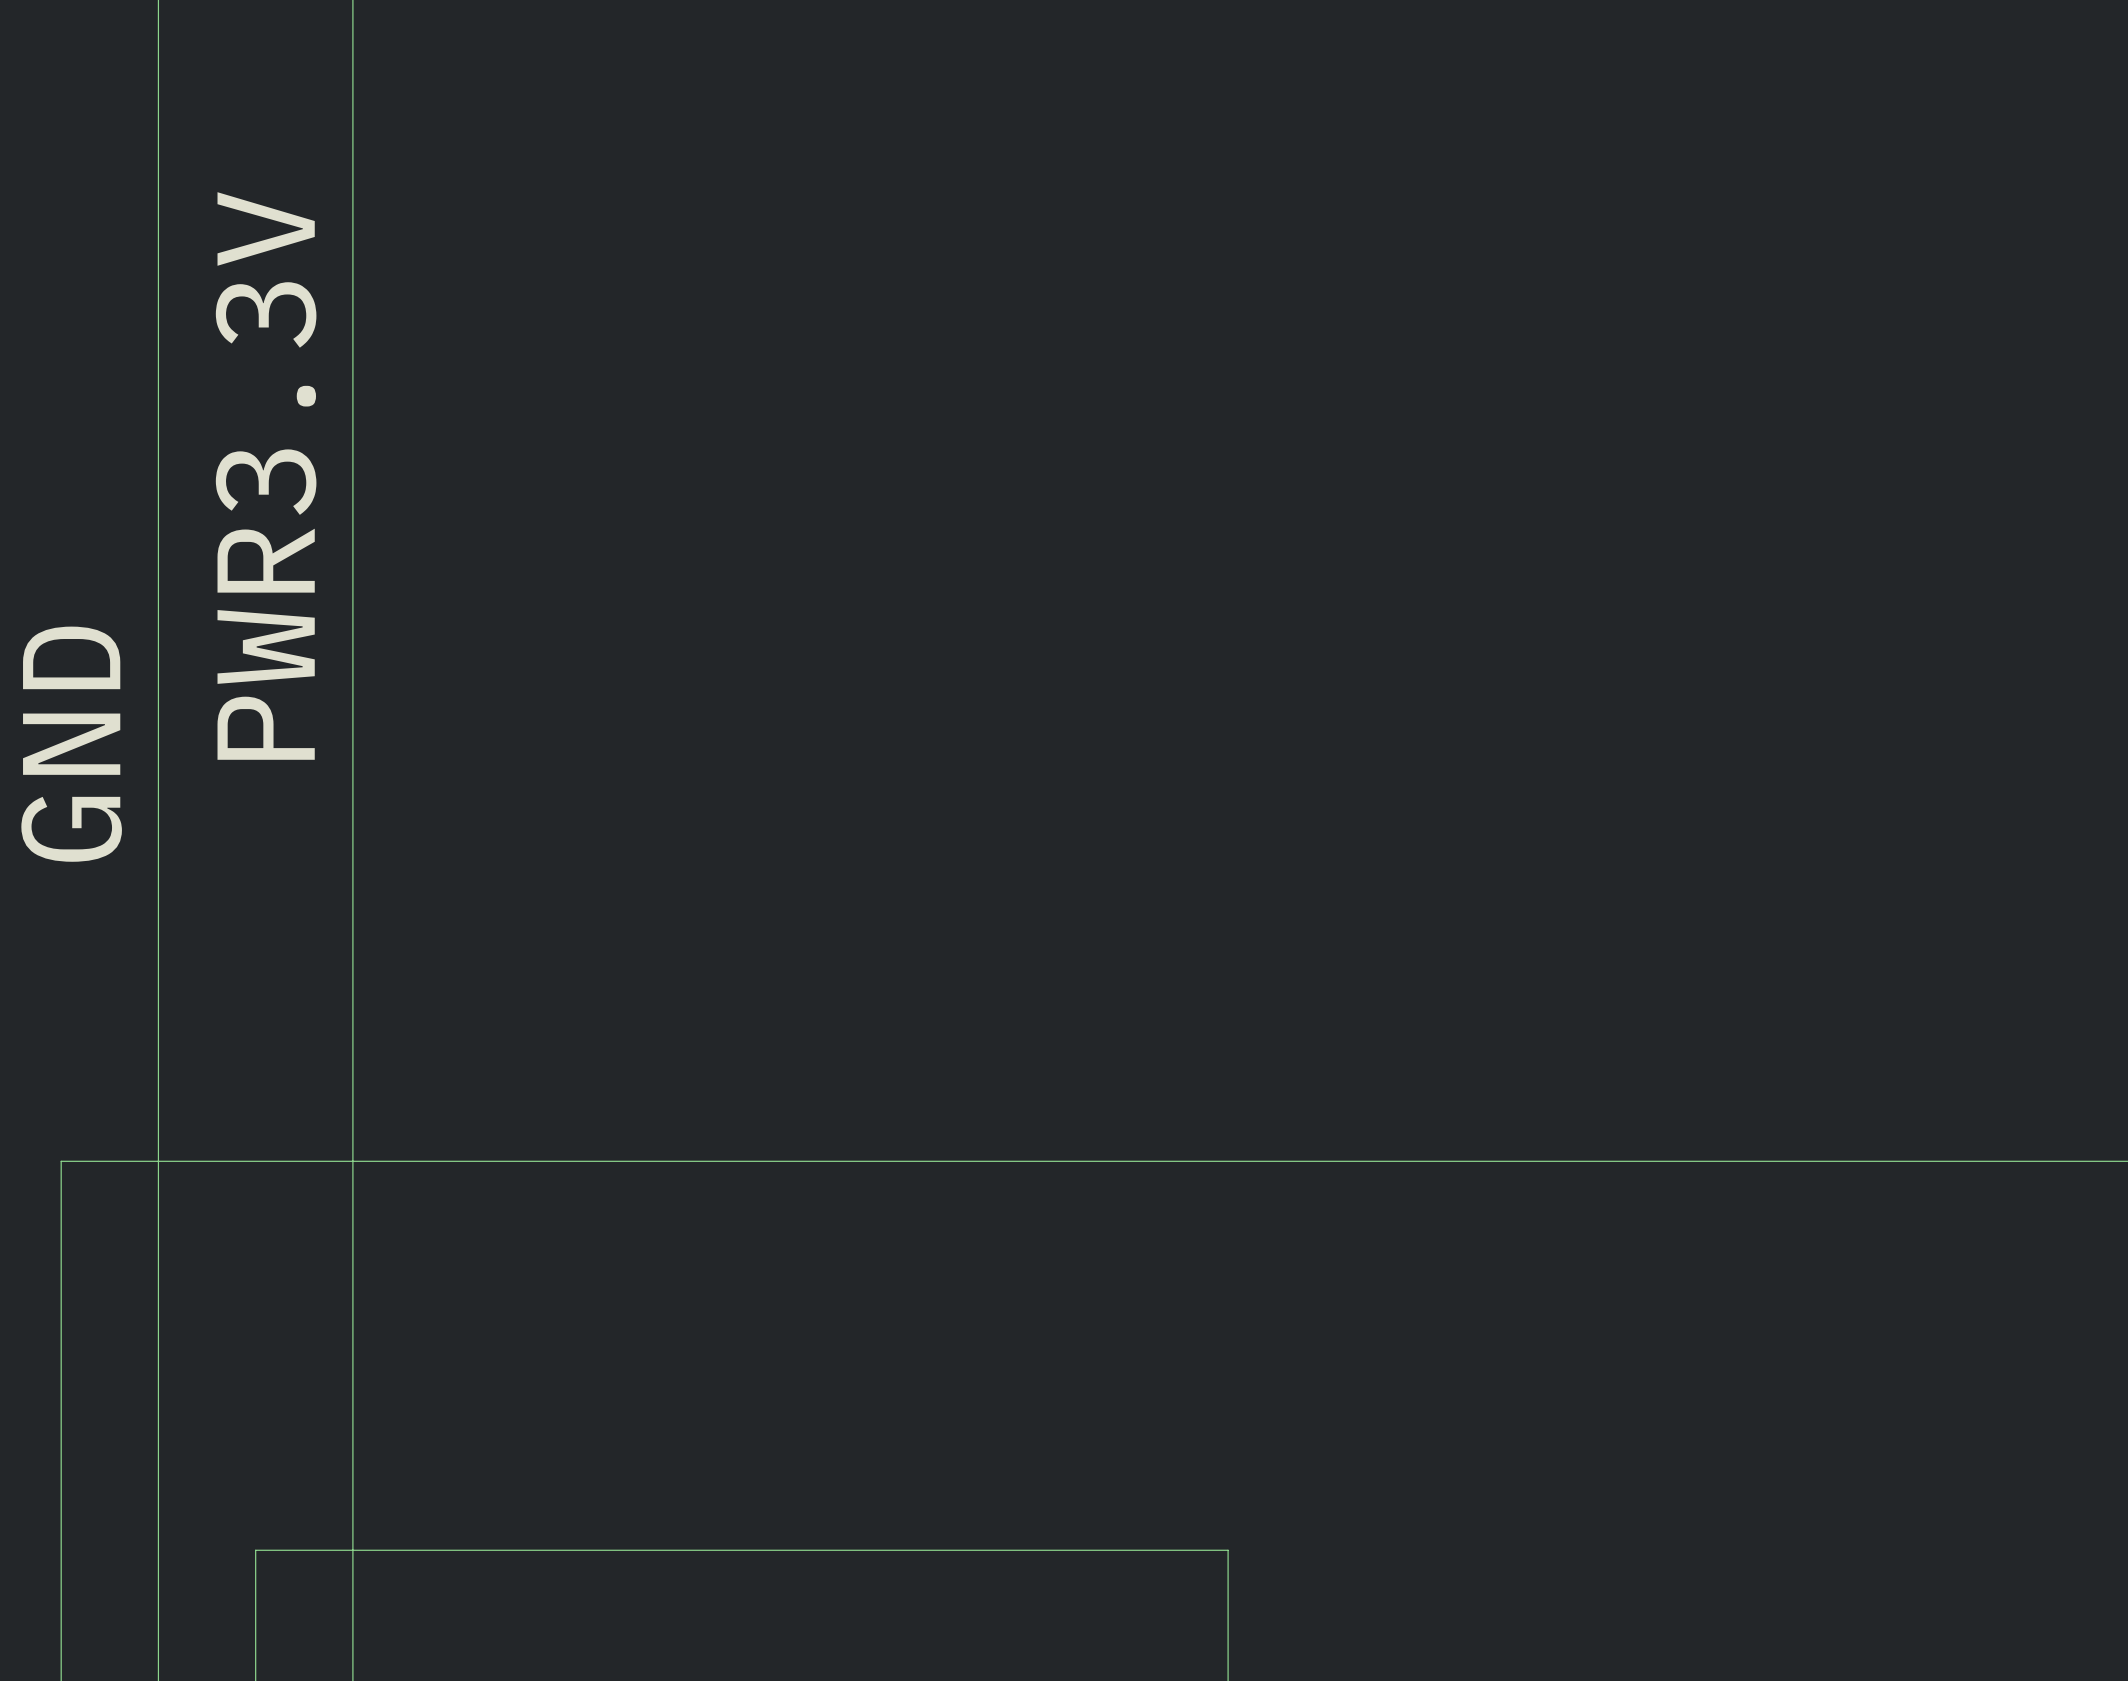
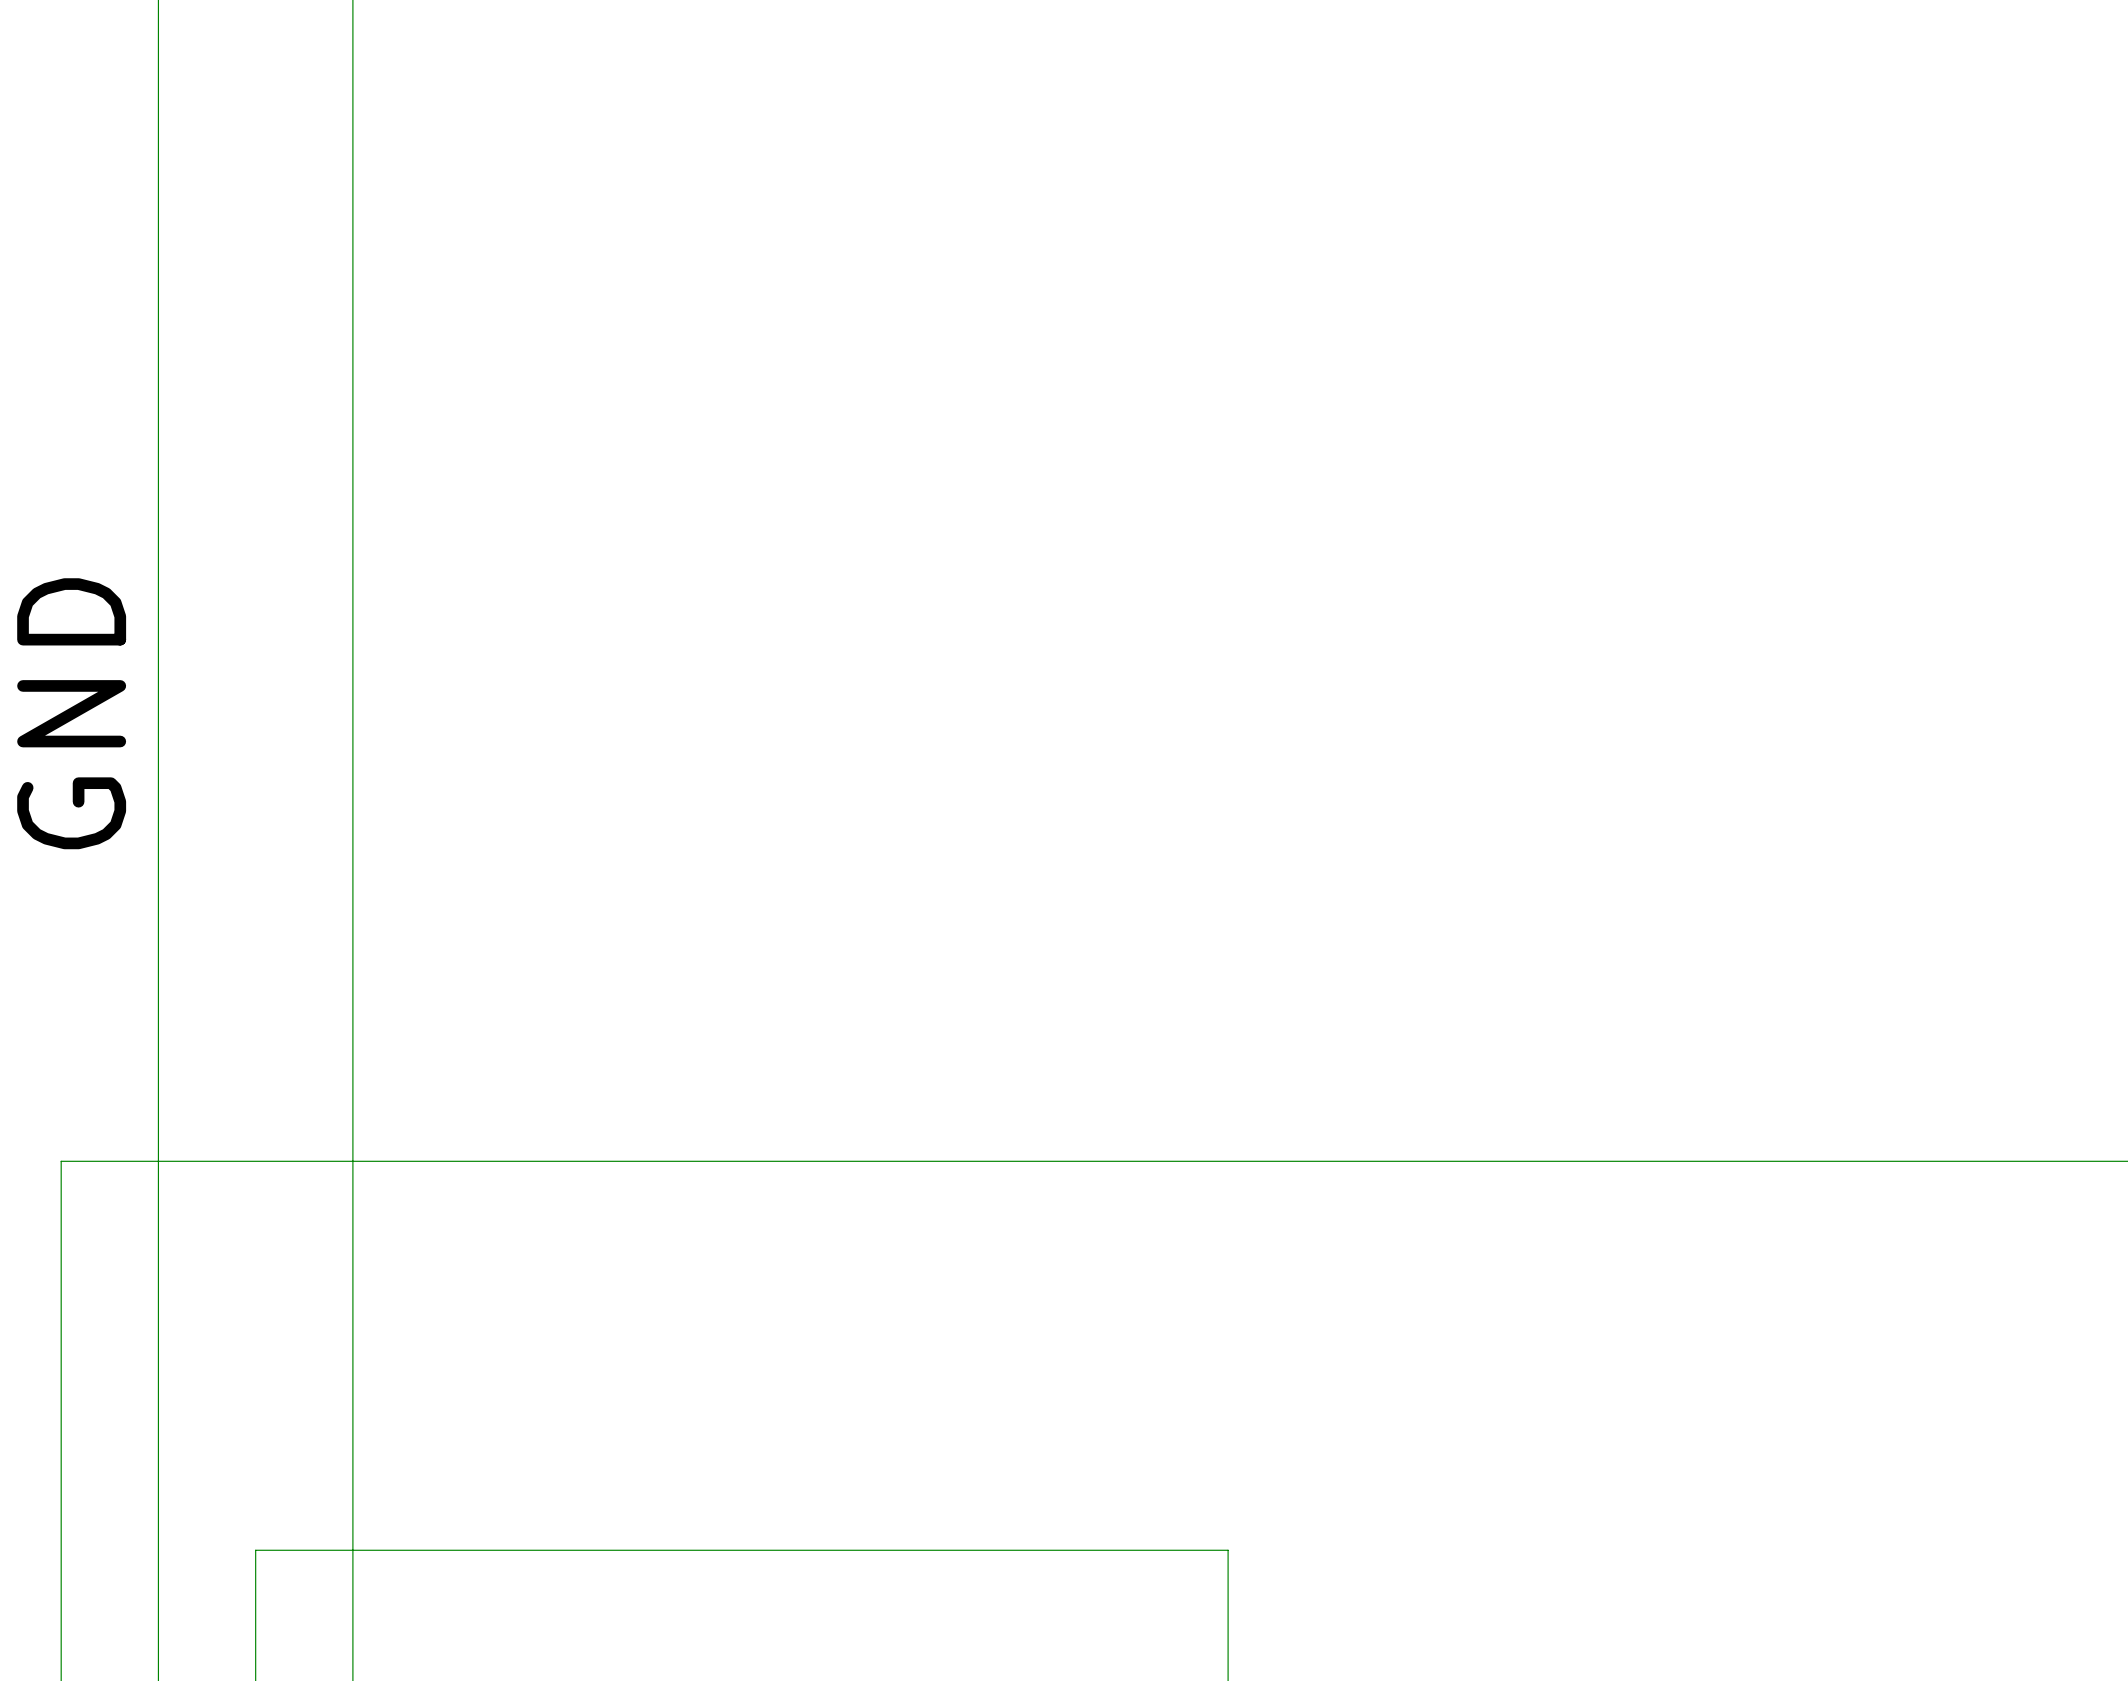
label: PWR3.3V (266, 476) -> none

